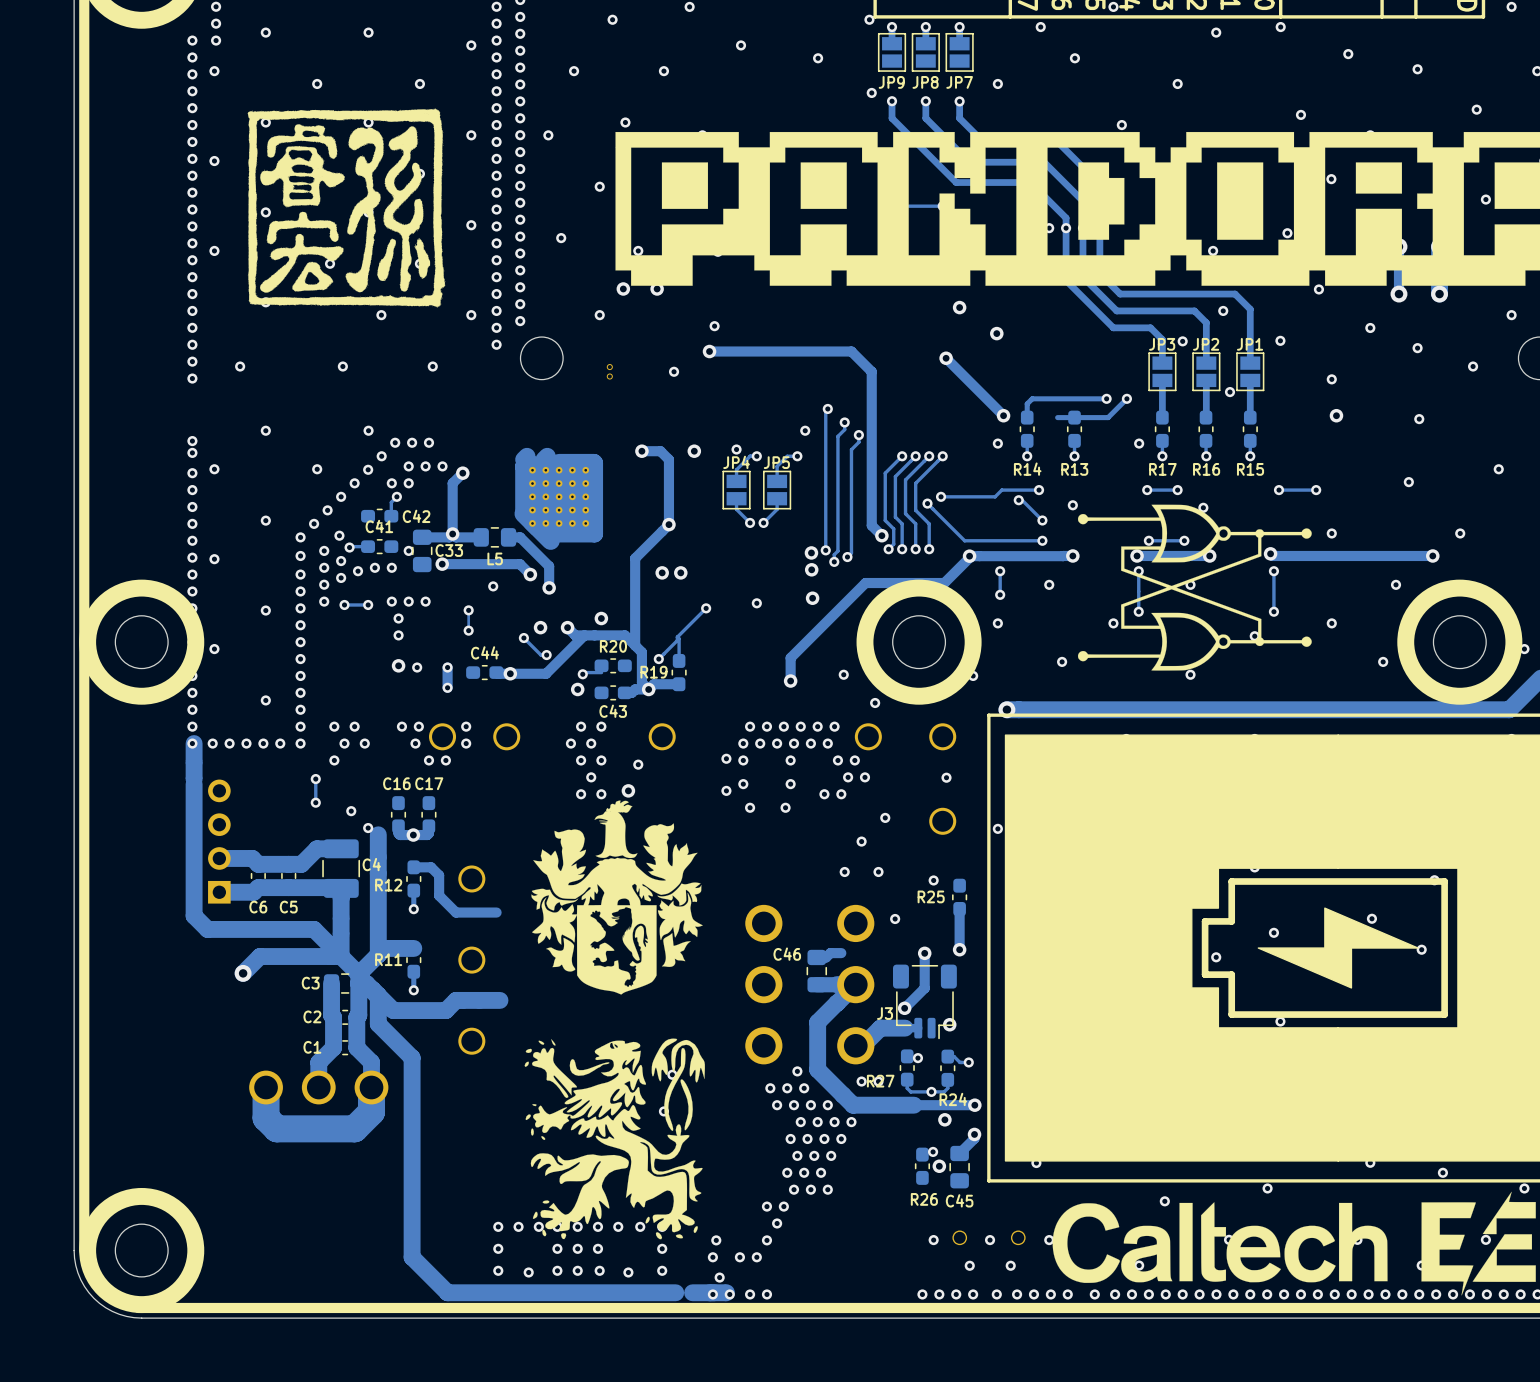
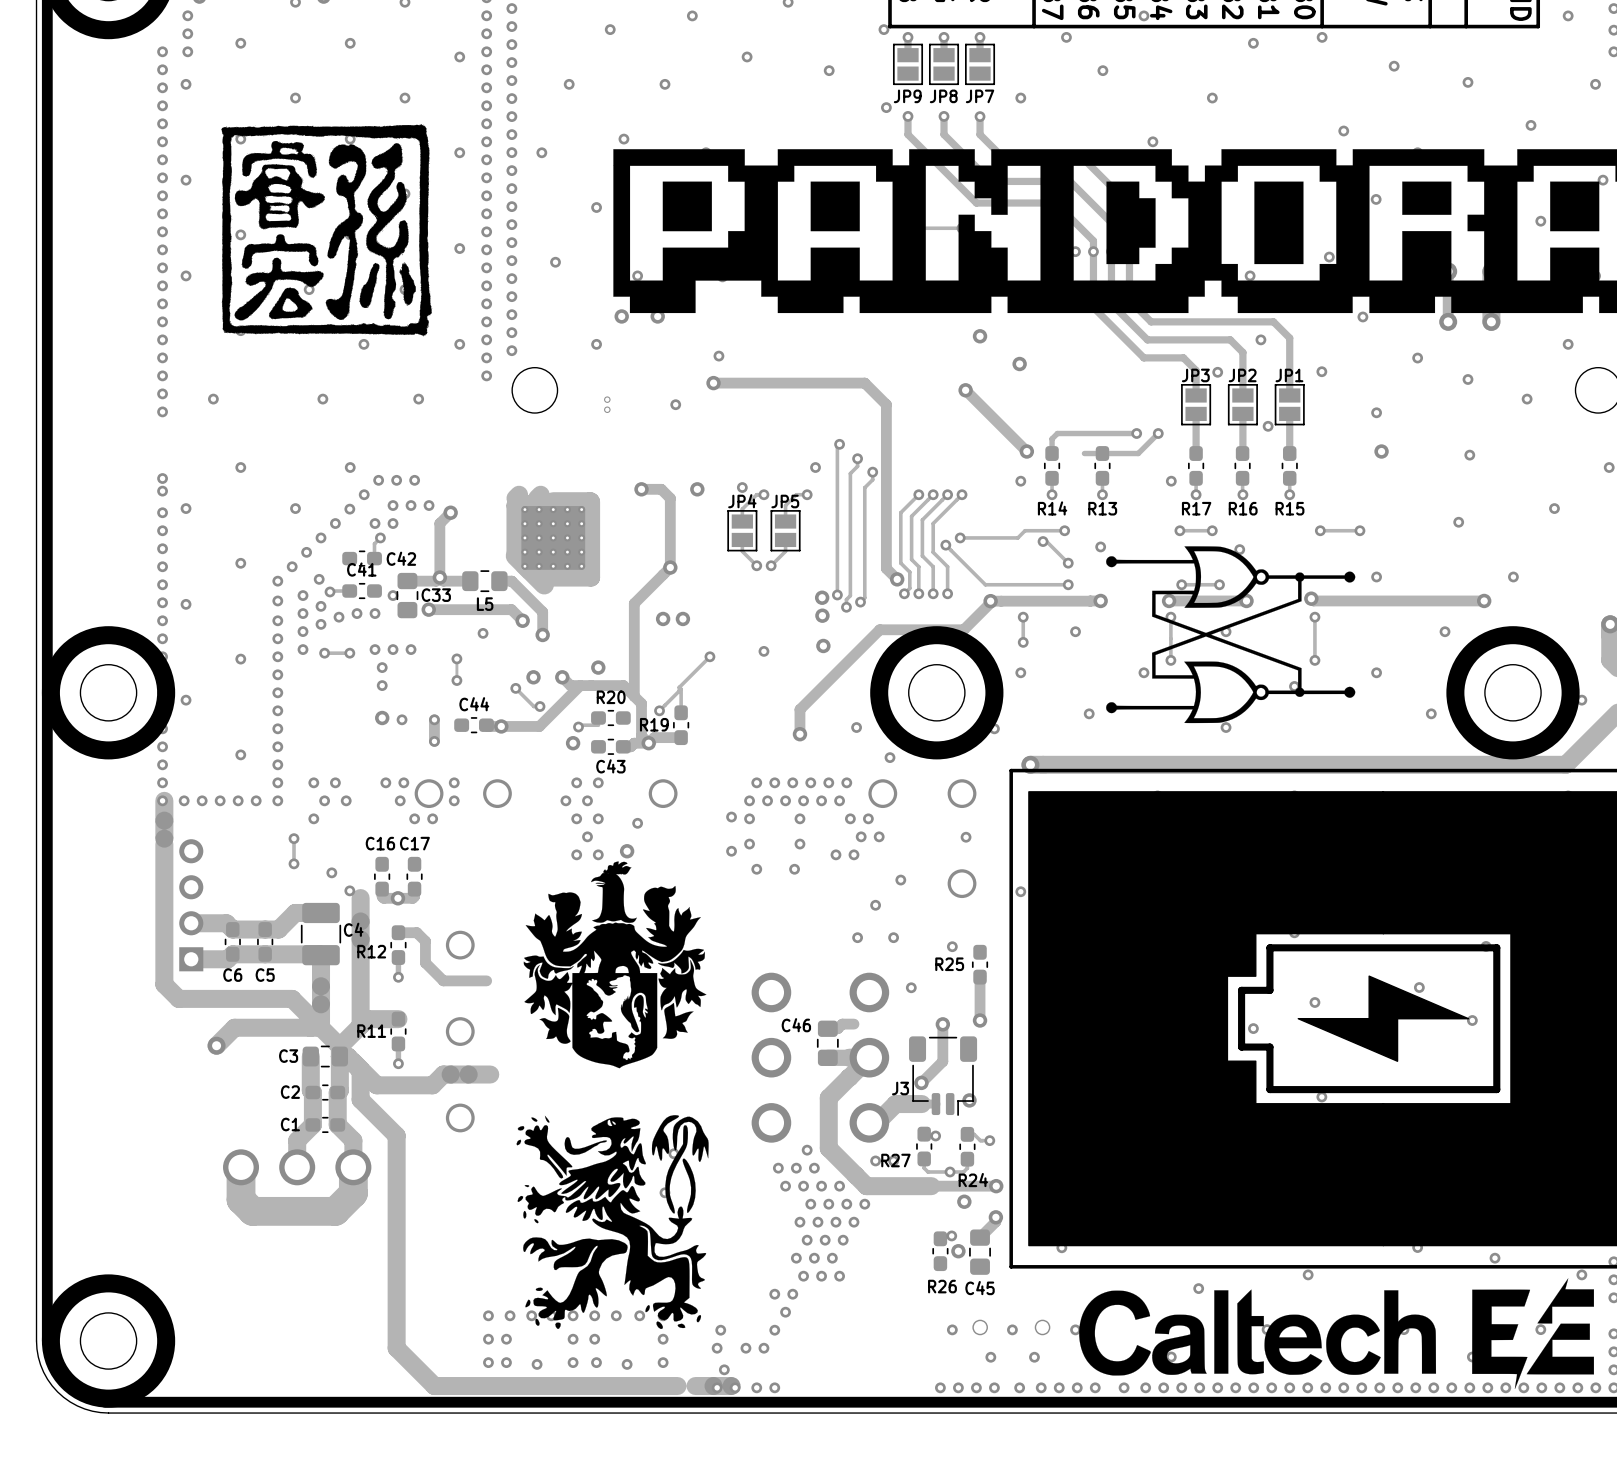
via: none -> (506, 1339)
via: (557, 1248) -> none
via: none -> (506, 1362)
via: (557, 1270) -> none
via: (528, 1272) -> none
via: none -> (537, 1364)

